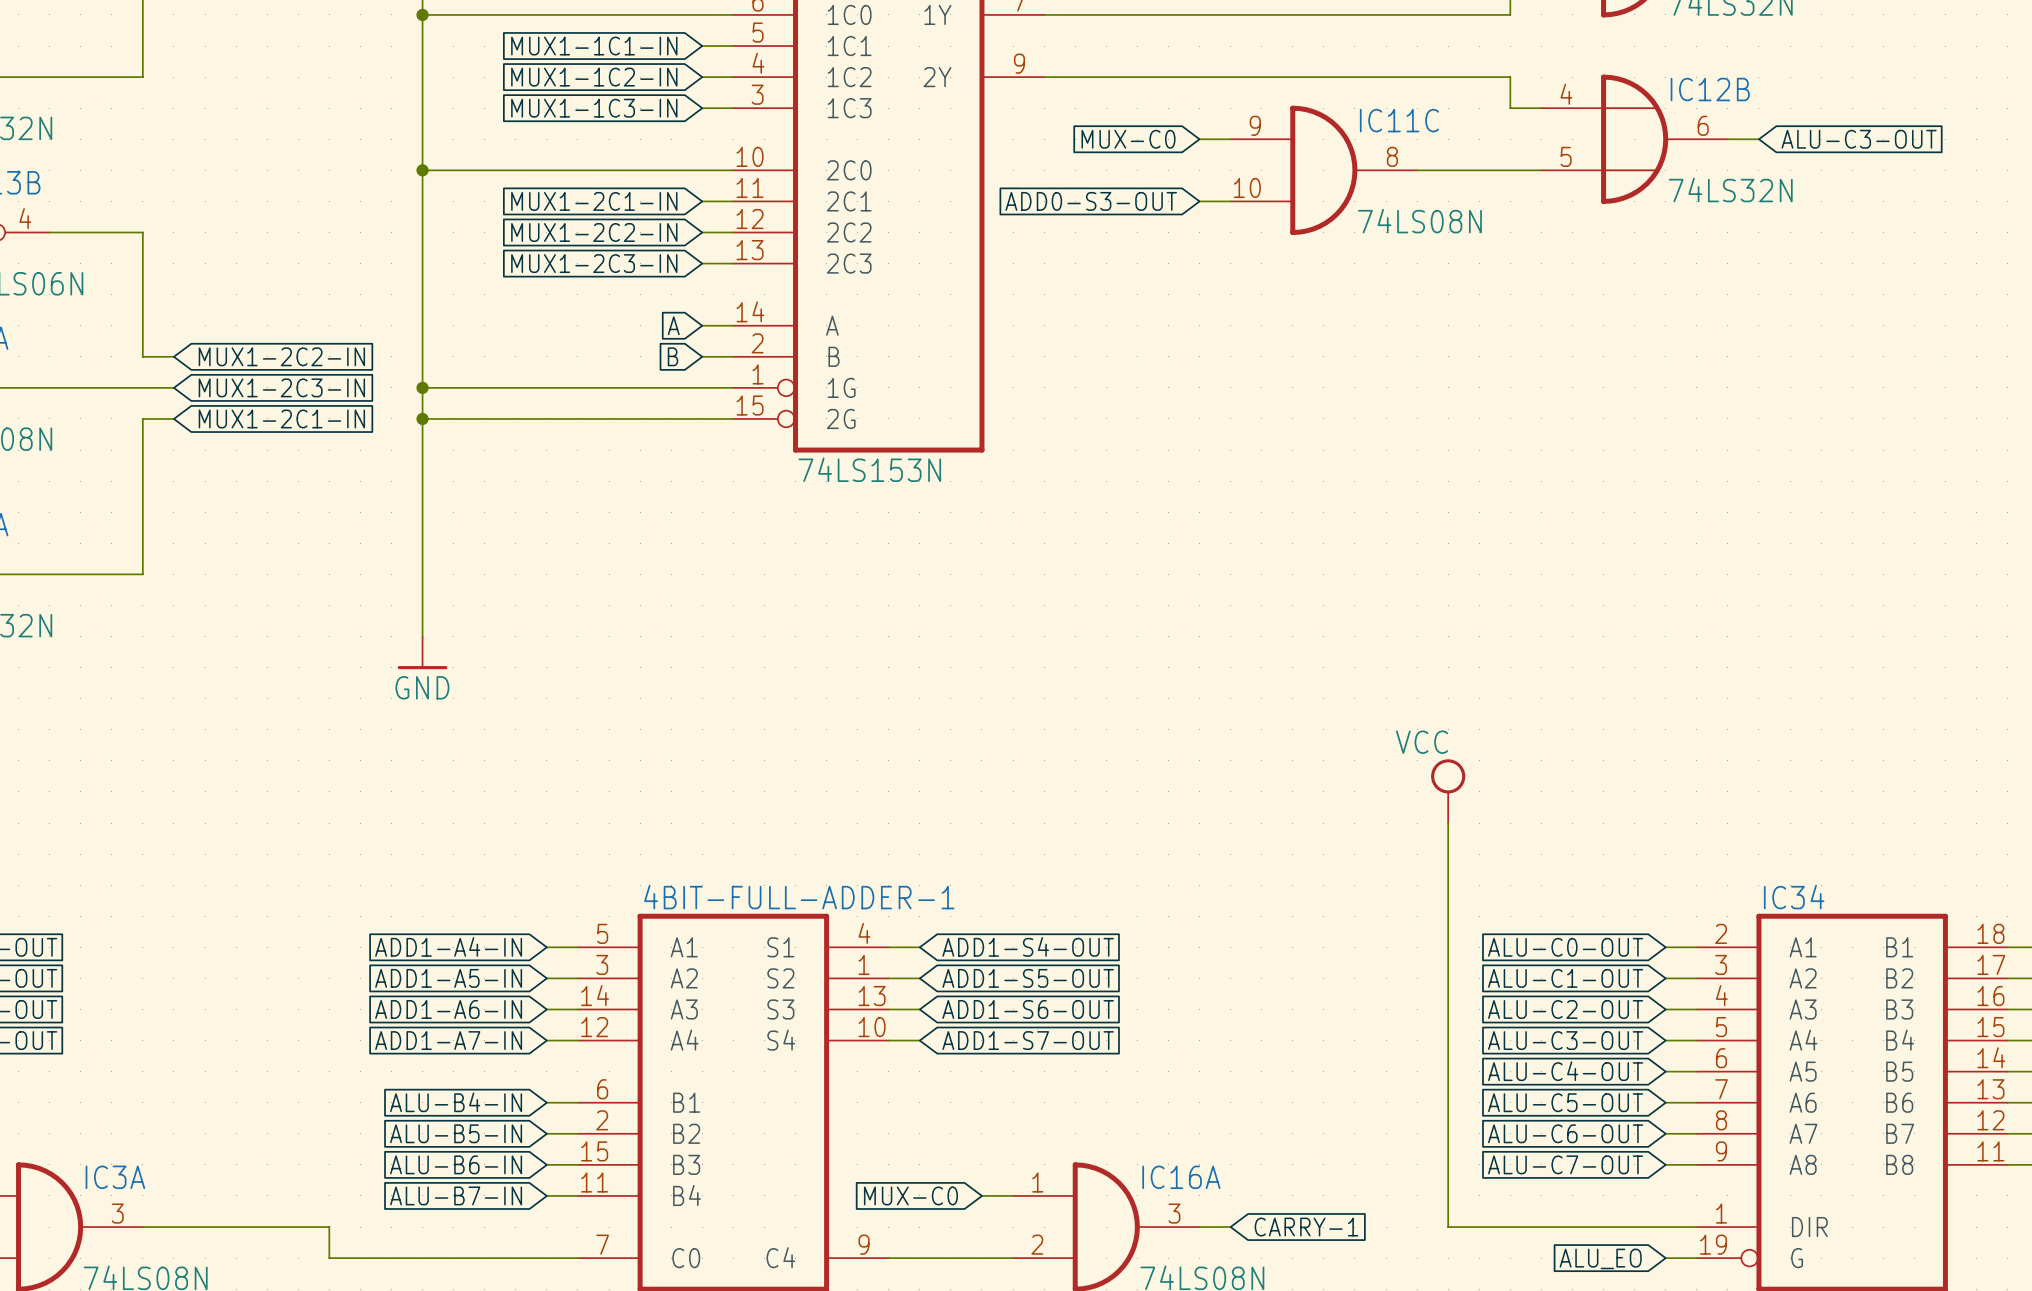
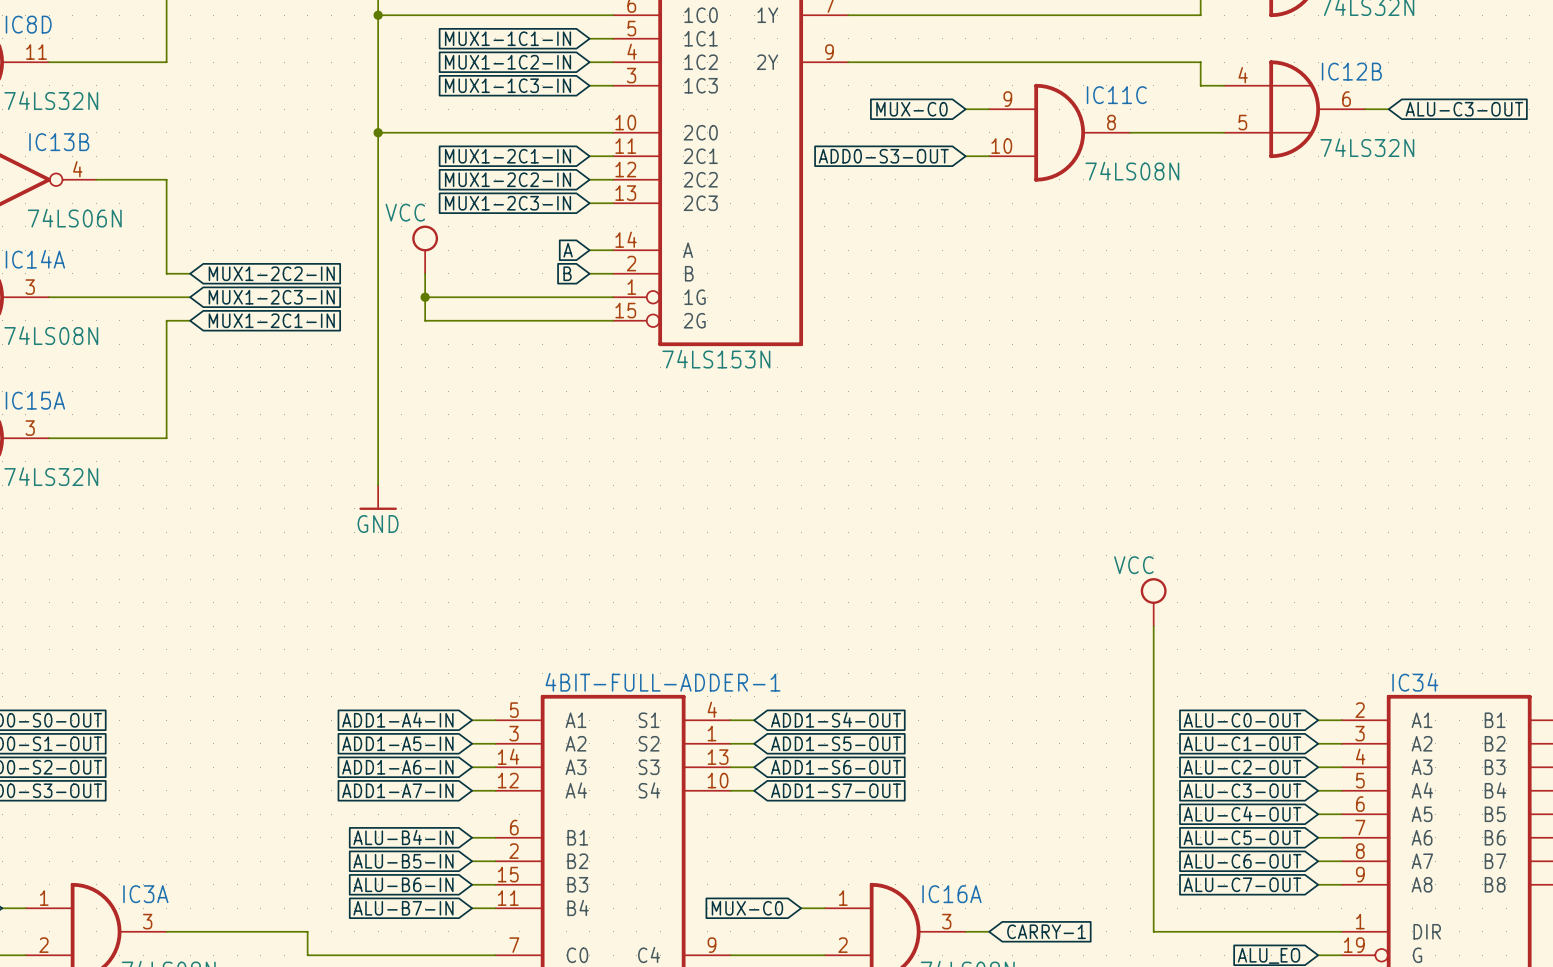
power symbol: none -> VCC (425, 249)
wire: (422, 387) (484, 387) -> none
junction: (422, 387) -> none
junction: none -> (425, 297)
wire: (422, 418) (484, 418) -> (425, 273) (425, 320)
junction: (422, 418) -> none

